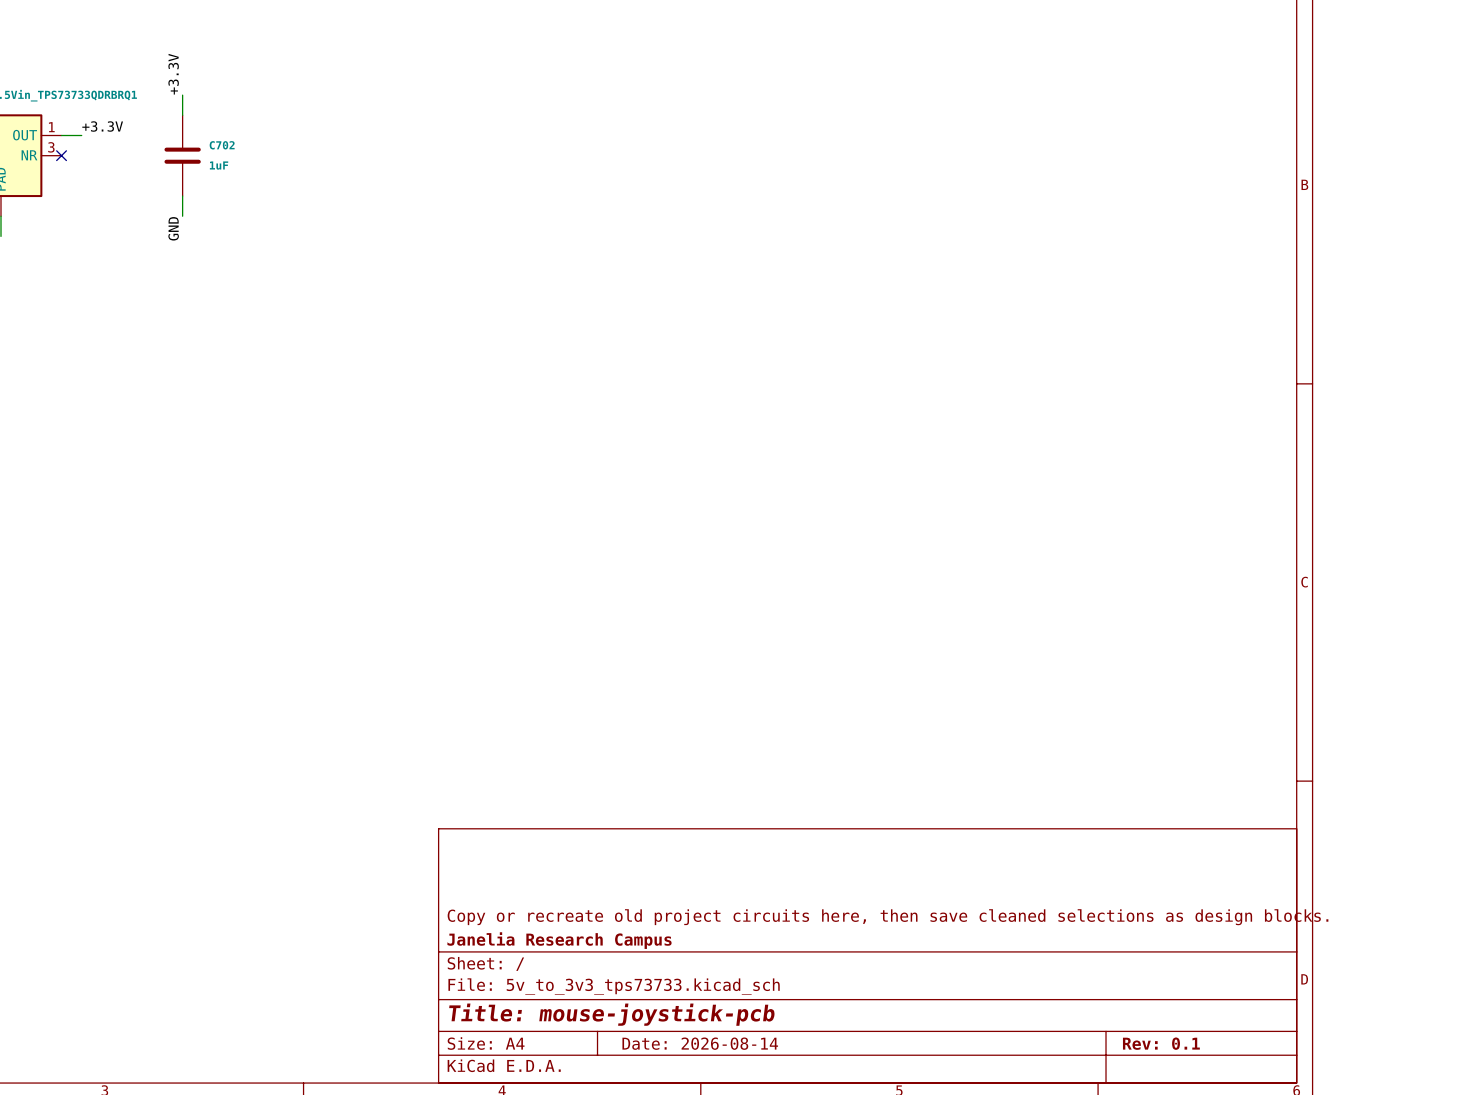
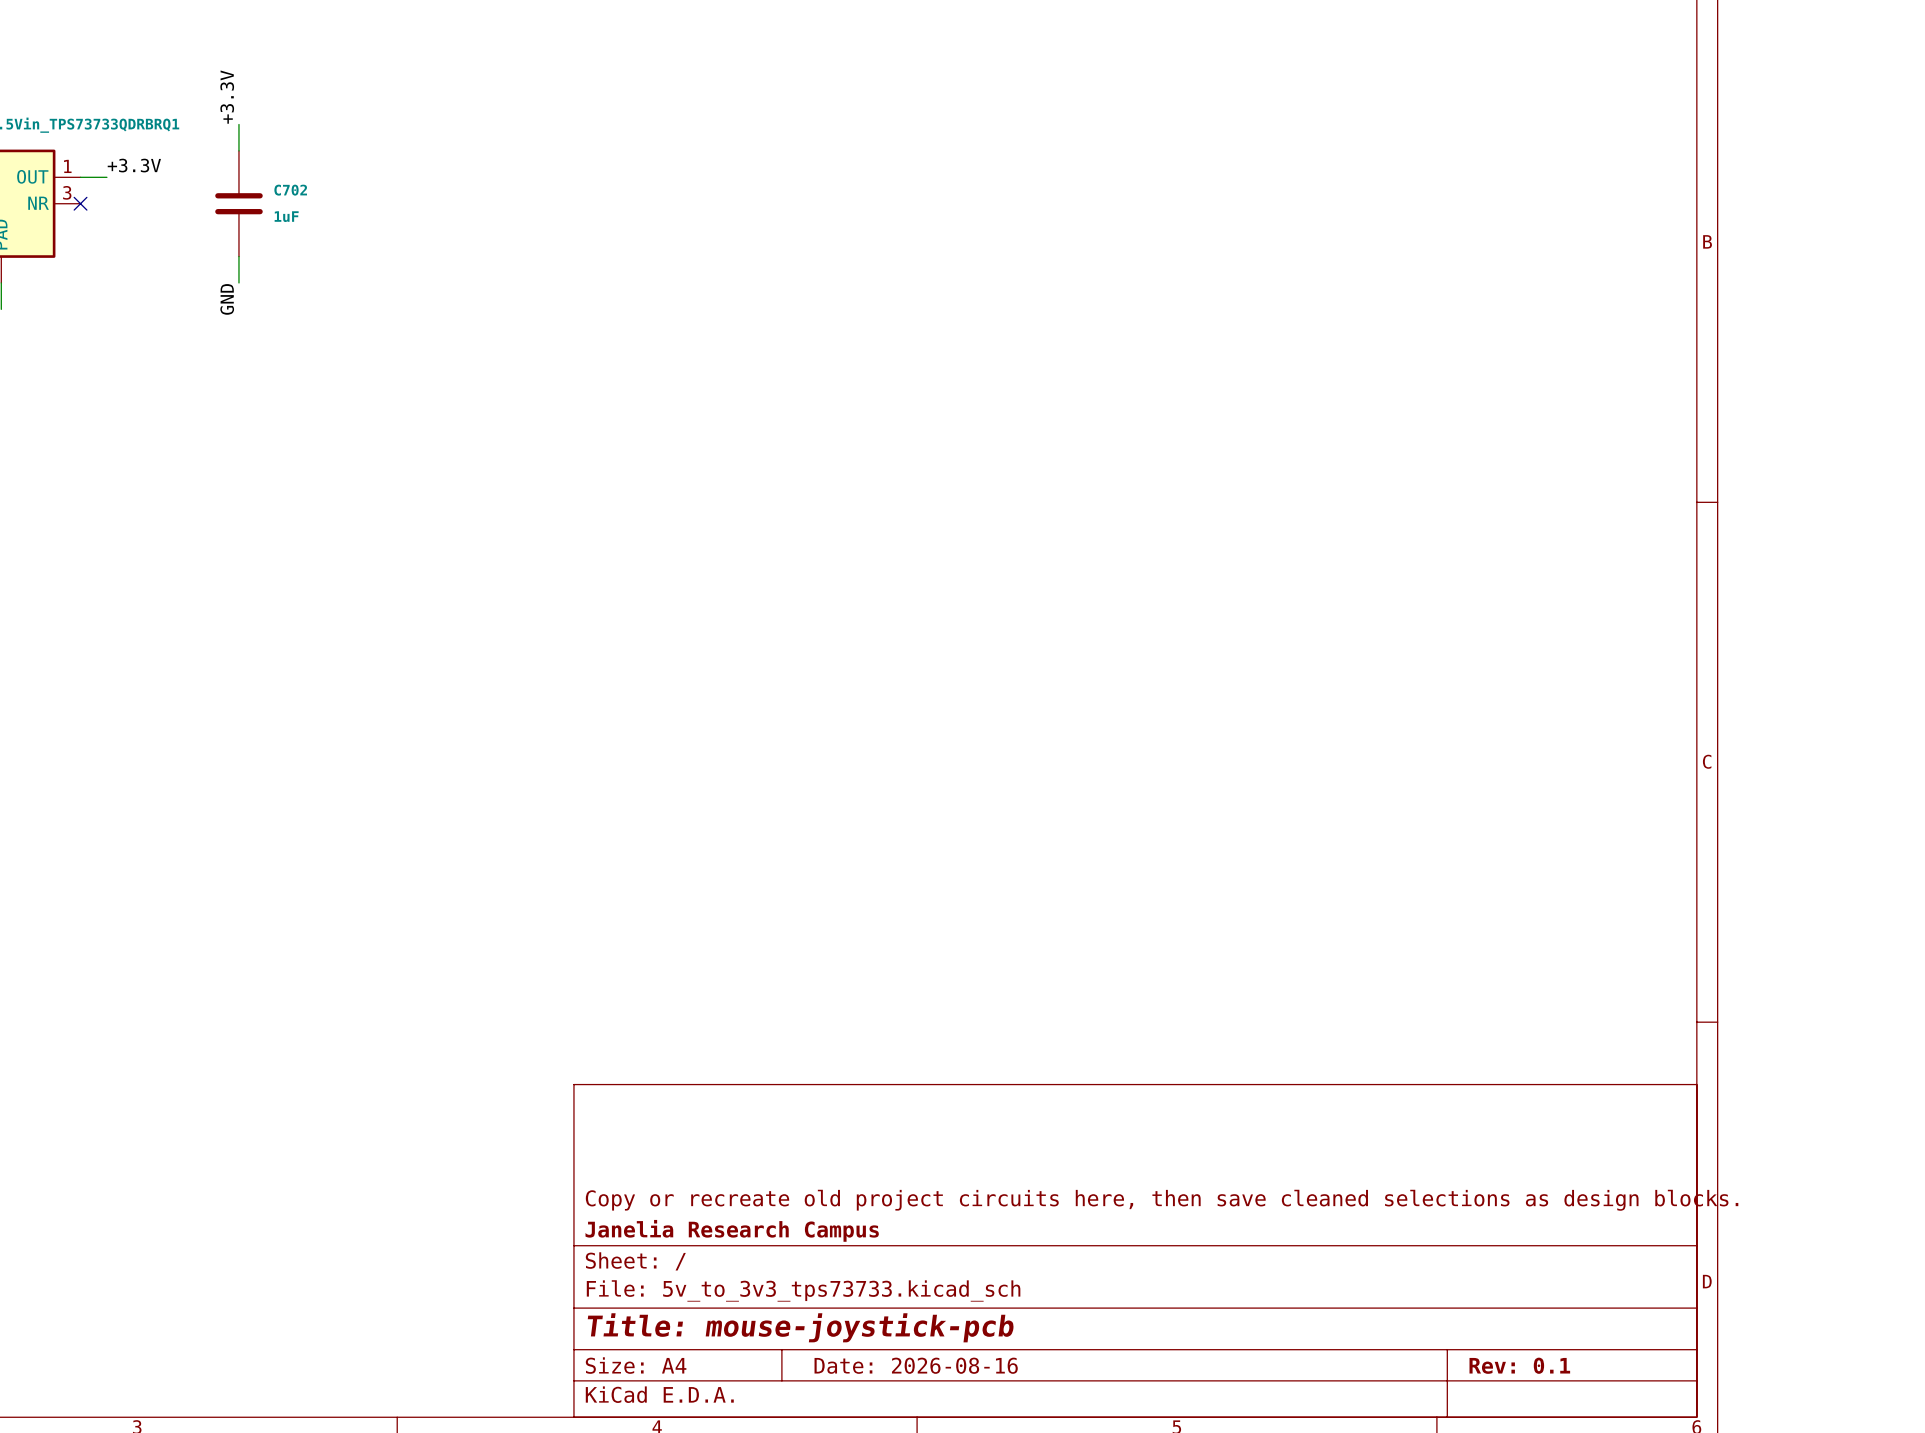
title block: Date: 2026-08-14 (700, 1043) -> Date: 2026-08-16 (916, 1365)

